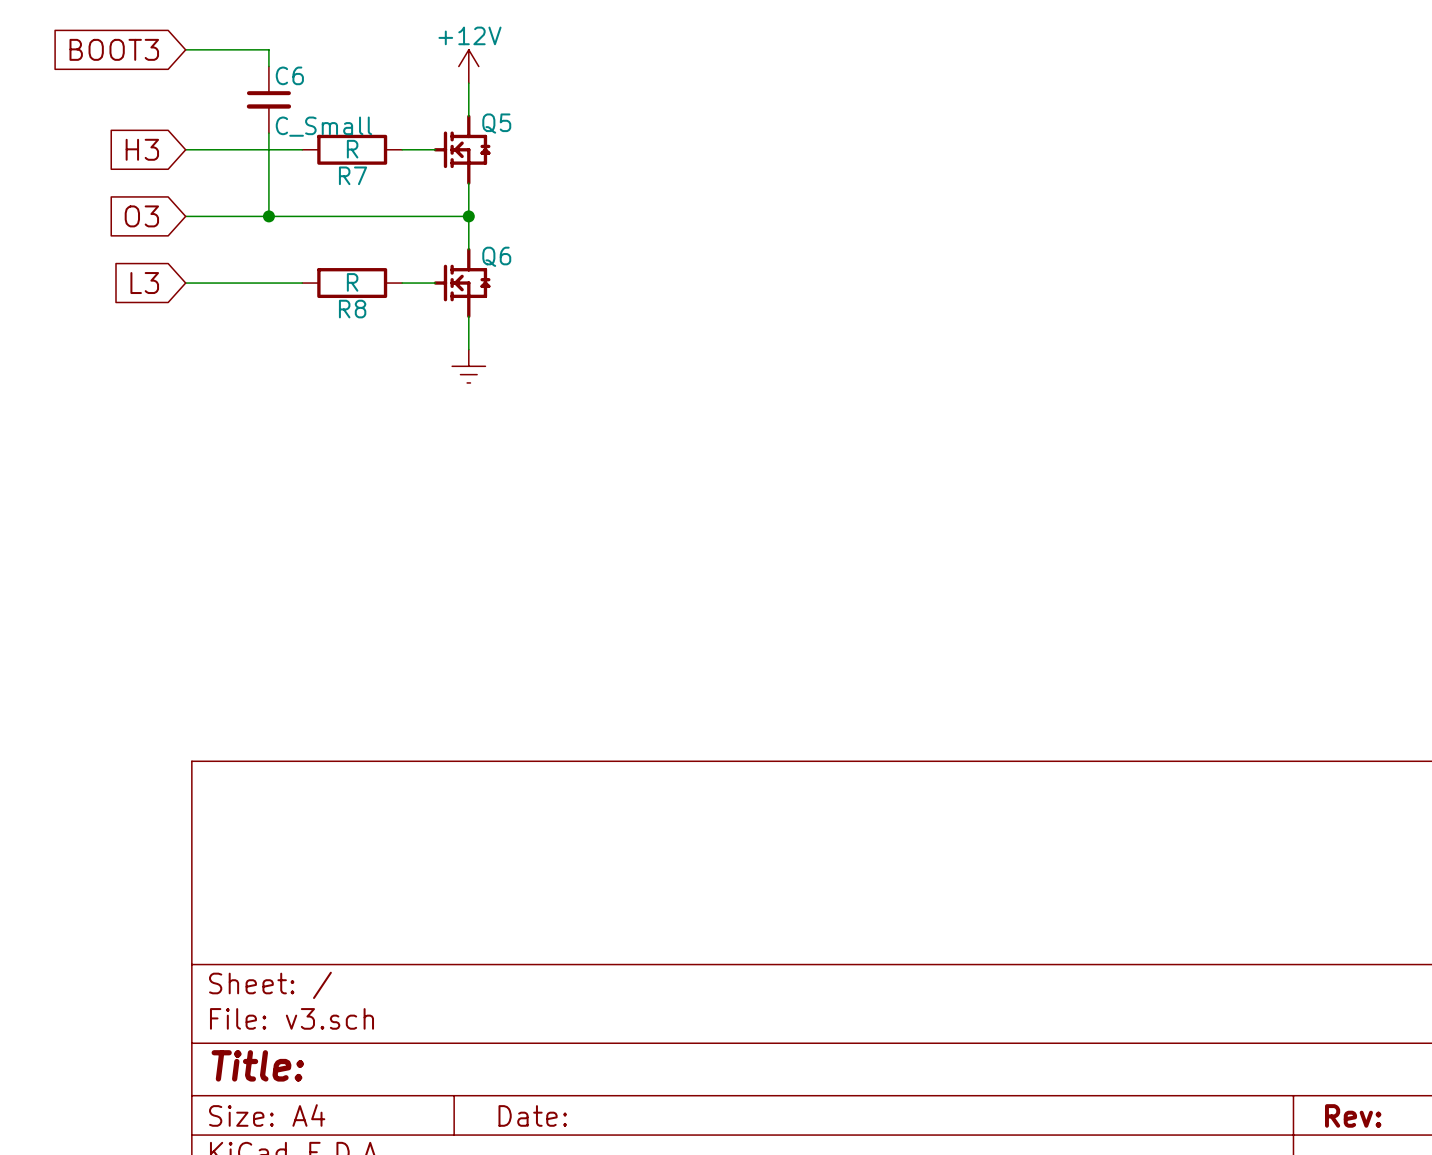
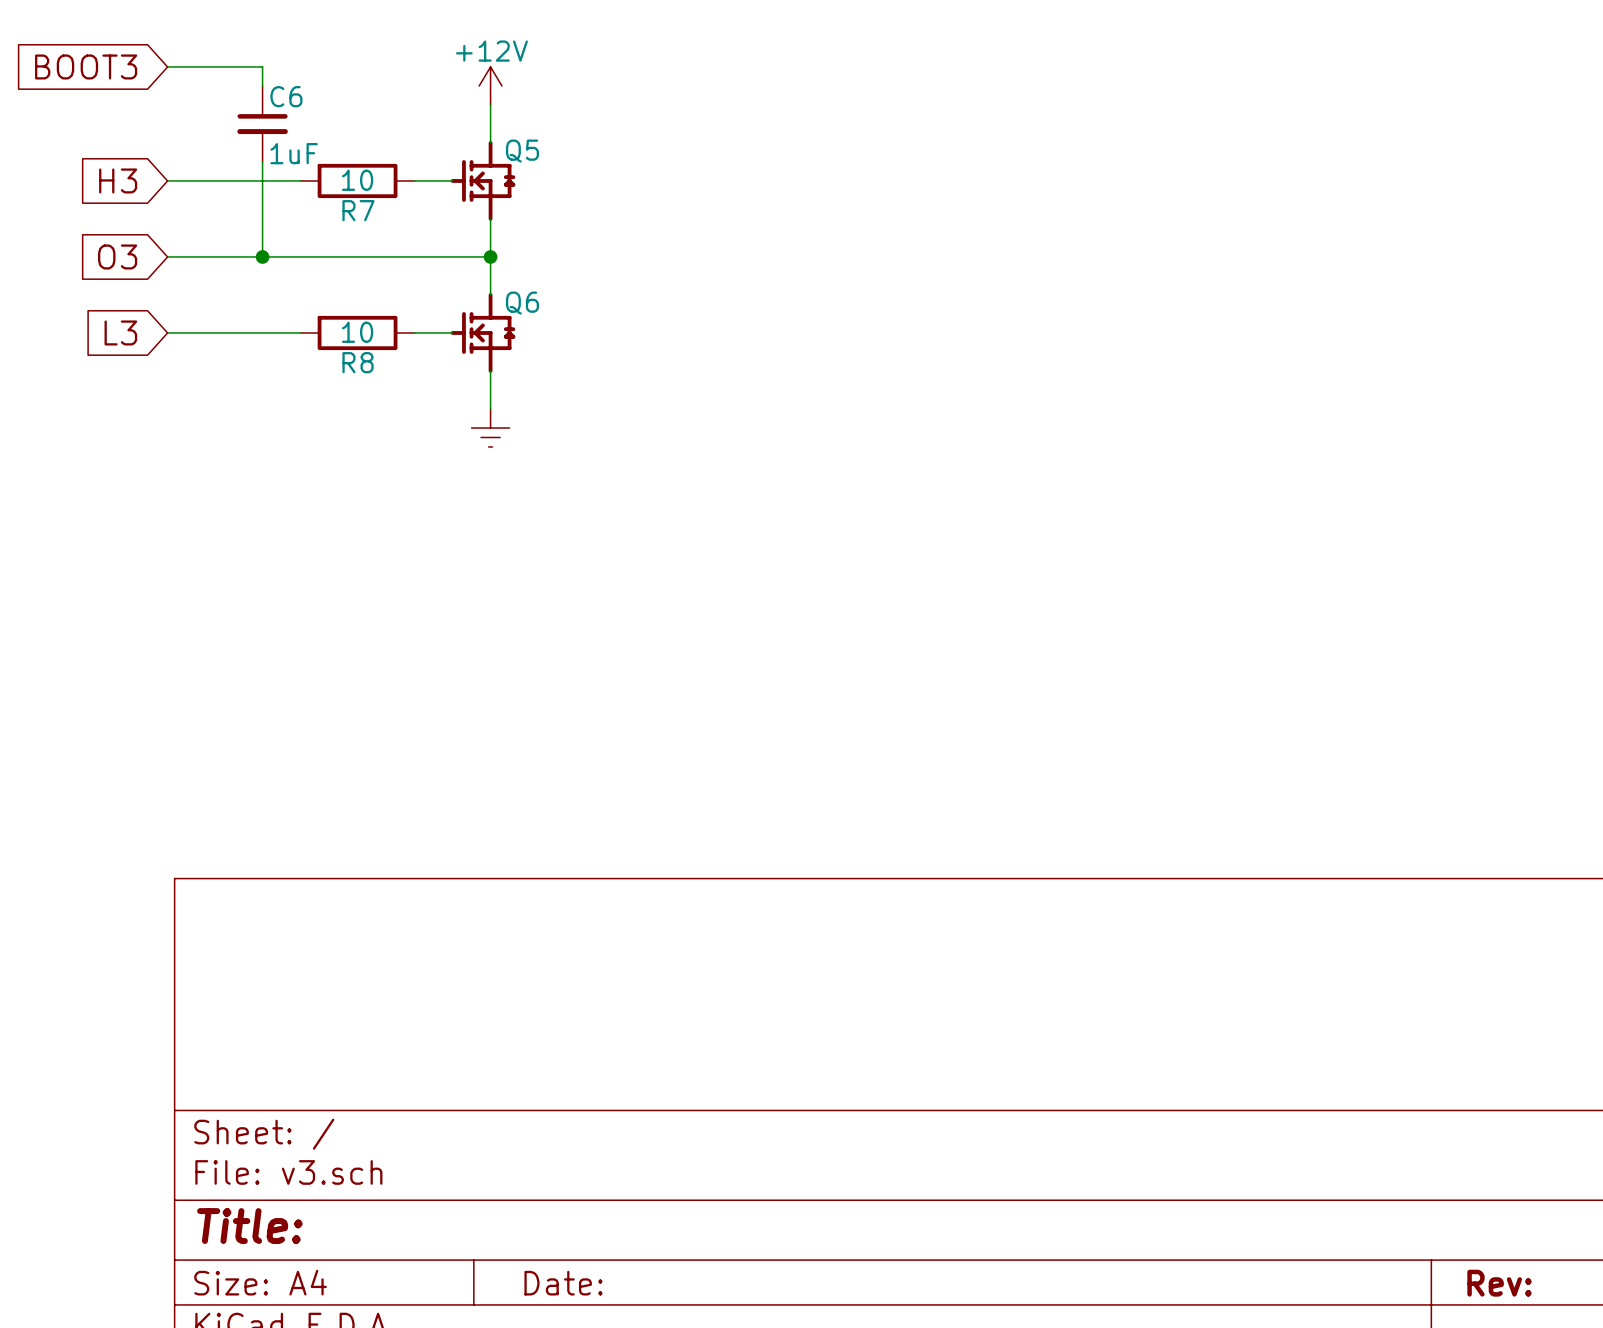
C6 value: C_Small (323, 126) -> 1uF (294, 153)
R7 value: R (352, 149) -> 10 (357, 180)
R8 value: R (352, 282) -> 10 (357, 332)

